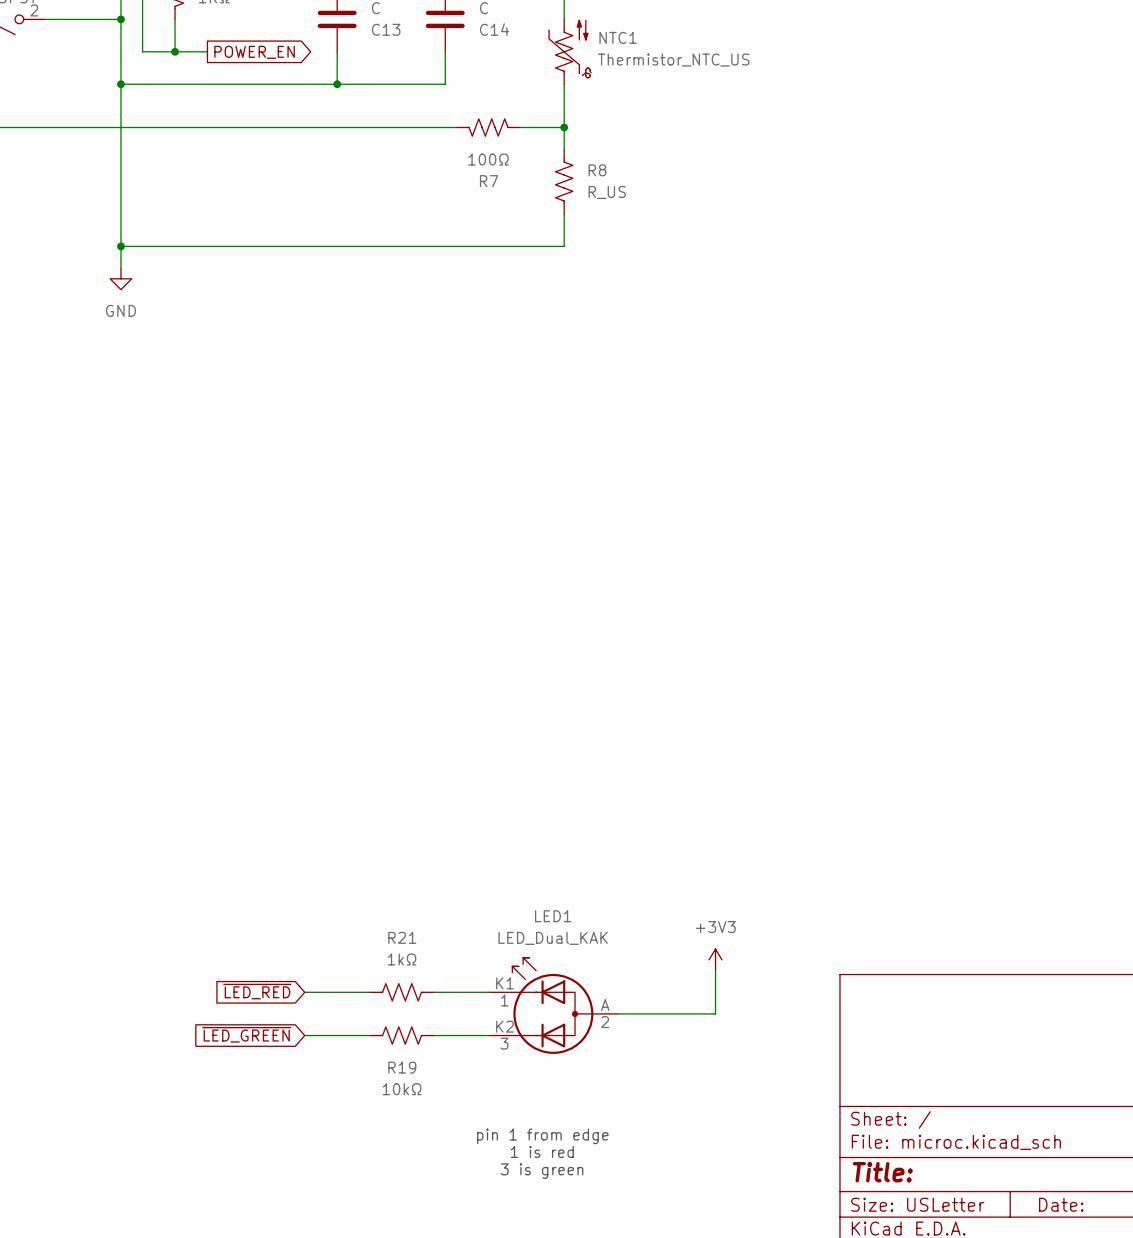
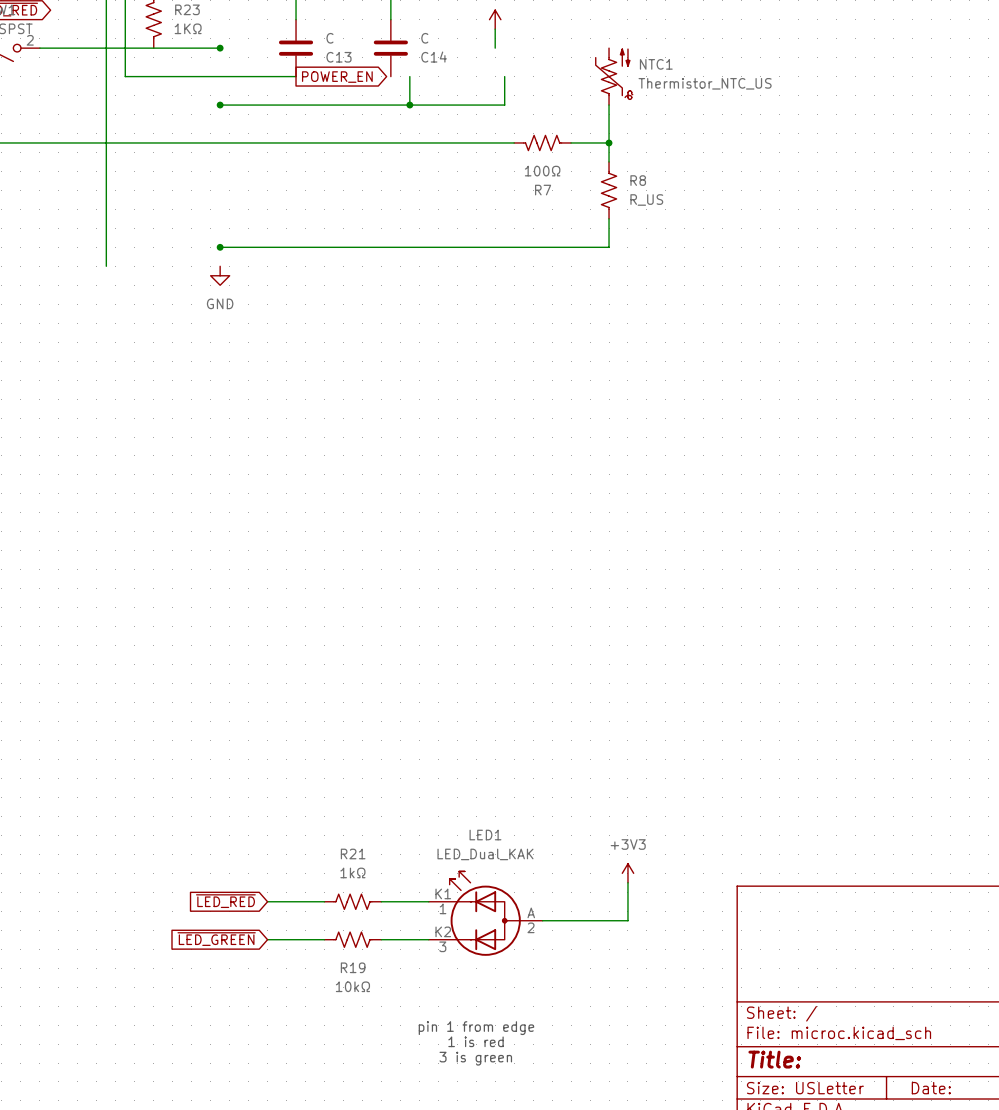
junction: (120, 19) -> none
wire: (175, 19) (175, 51) -> none
junction: none -> (220, 48)
junction: (175, 51) -> none
wire: (337, 51) (337, 84) -> (296, 76) (182, 76)
wire: (445, 51) (445, 84) -> (504, 76) (504, 105) (390, 105)
wire: none -> (409, 76) (409, 105)
NTC1 position: (570, 51) -> (614, 76)
global label position: POWER_EN (254, 52) -> POWER_EN (337, 77)
wire: (120, 84) (250, 84) -> (106, 48) (220, 48)
junction: (120, 84) -> none
junction: none -> (220, 105)
junction: (337, 84) -> none
junction: none -> (409, 105)
wire: (564, 84) (564, 149) -> (609, 105) (609, 161)
R7 position: (488, 127) -> (542, 142)
wire: none -> (495, 142) (514, 142)
junction: (564, 127) -> none
wire: none -> (571, 142) (609, 142)
junction: none -> (609, 142)
R8 position: (564, 181) -> (609, 190)
wire: (564, 213) (564, 246) -> (609, 218) (609, 247) (495, 247)
wire: (120, 246) (250, 246) -> none
junction: (120, 246) -> none
junction: none -> (220, 247)
power symbol position: GND (120, 278) -> GND (220, 275)

